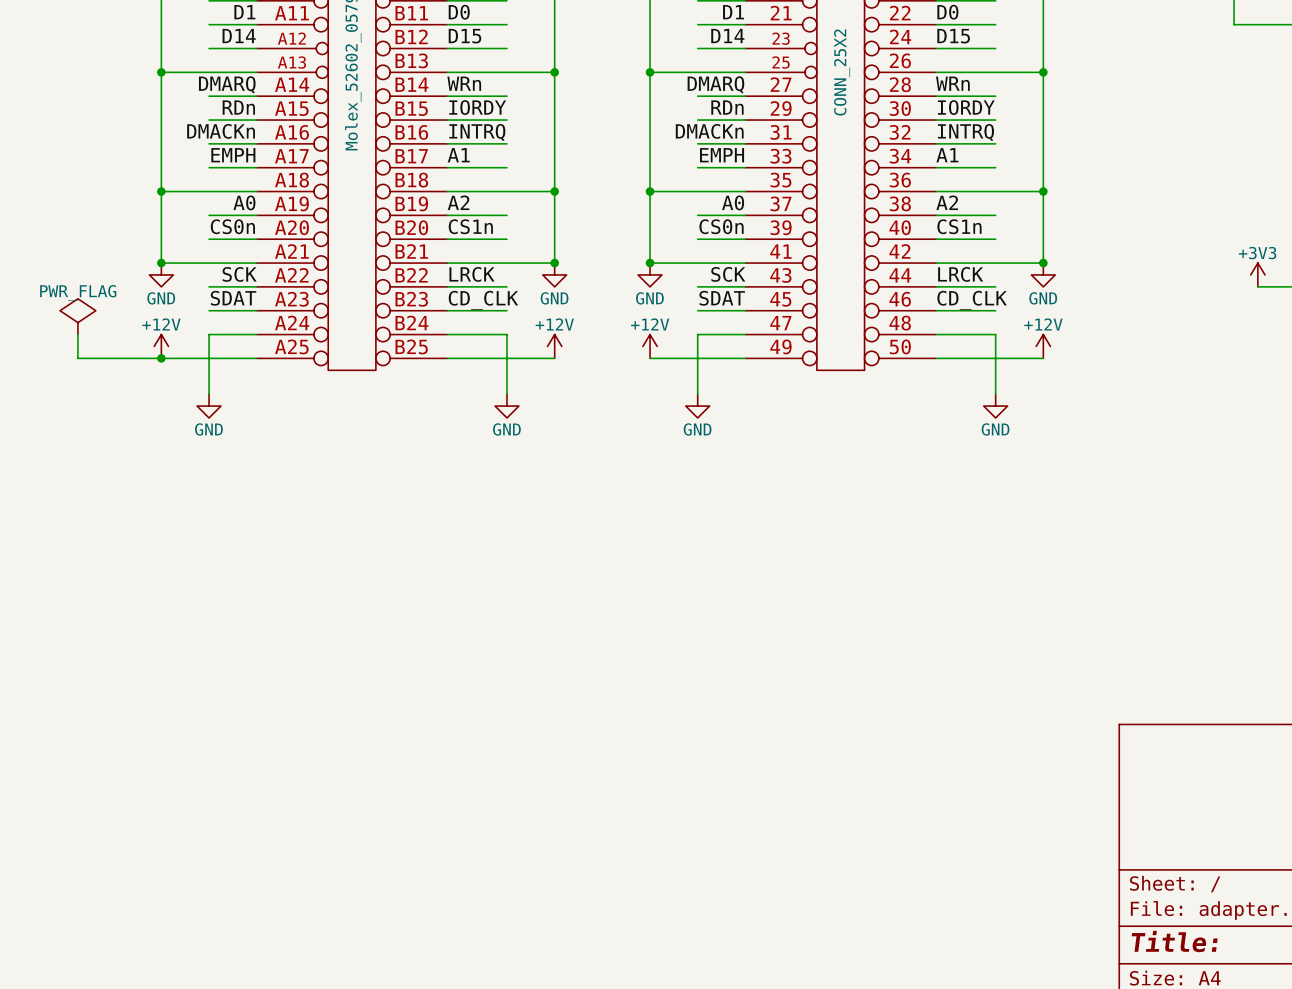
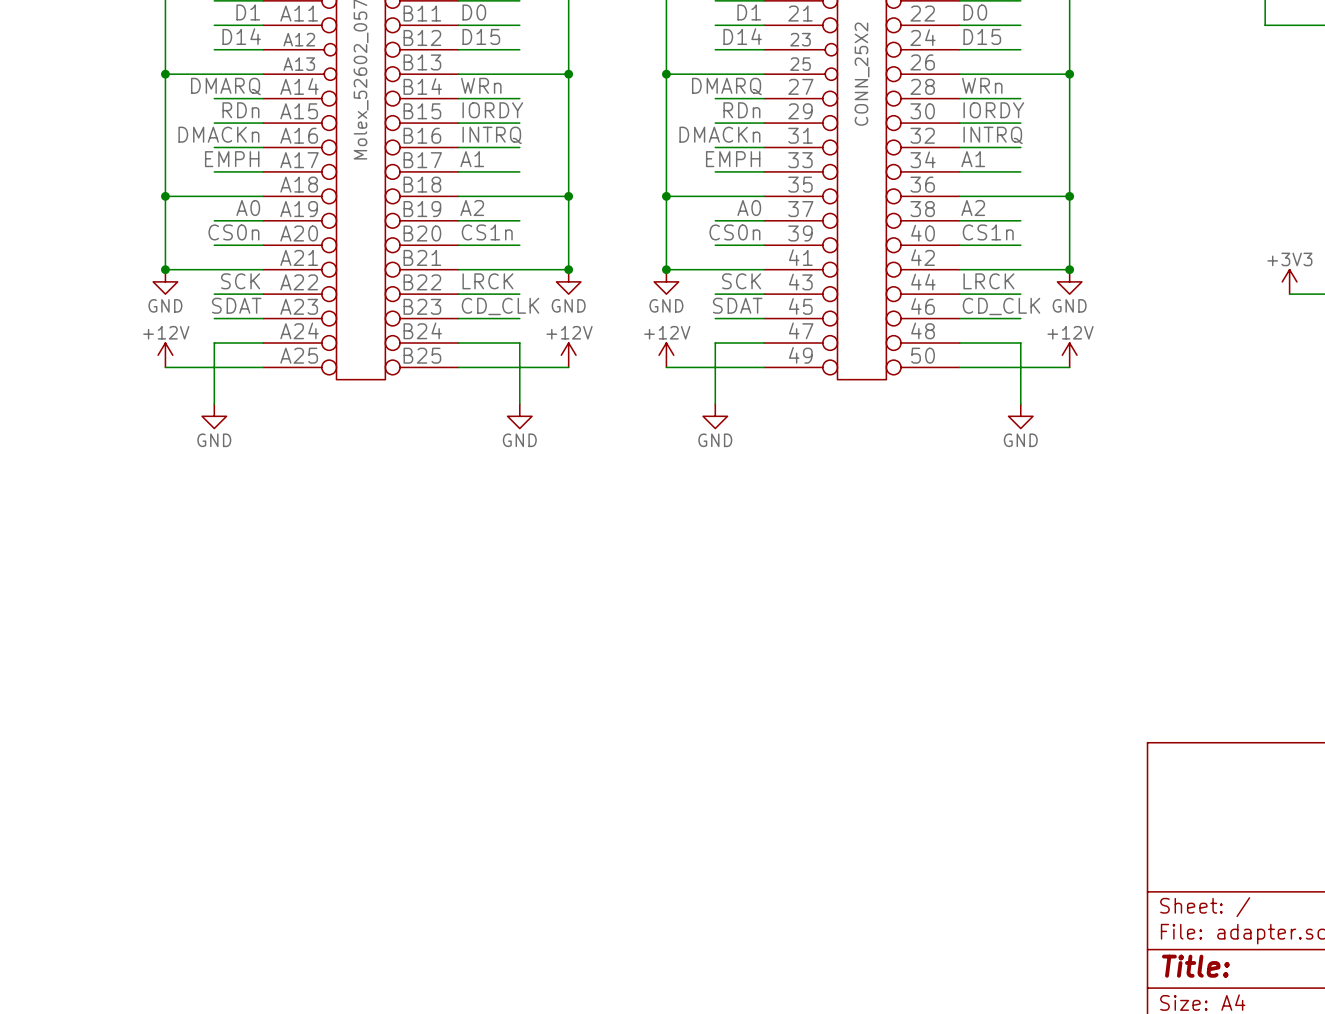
power symbol: PWR_FLAG (77, 316) -> none
wire: (77, 334) (77, 358) (161, 358) -> none
junction: (161, 358) -> none

